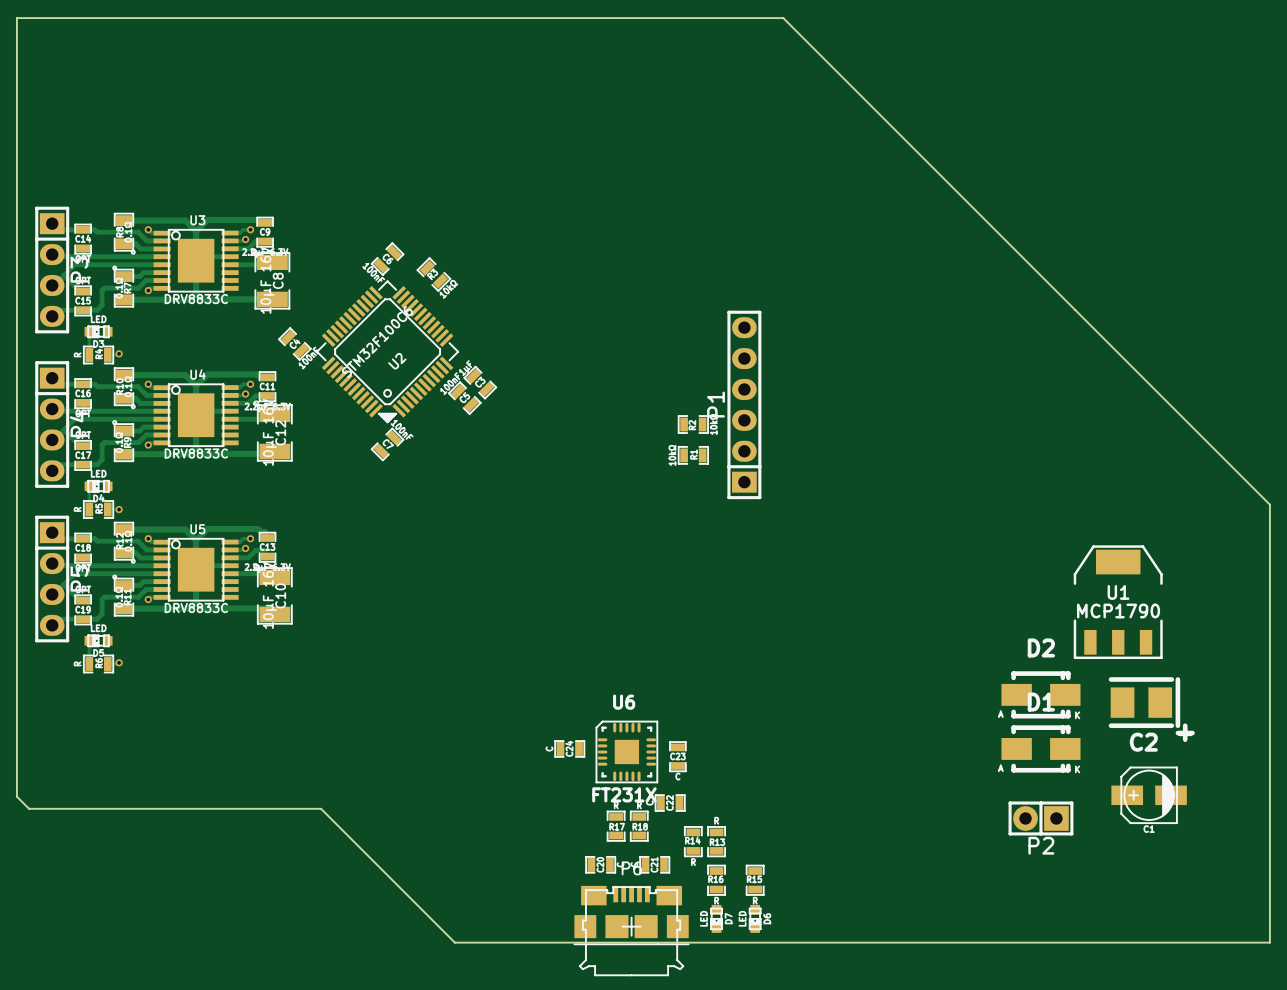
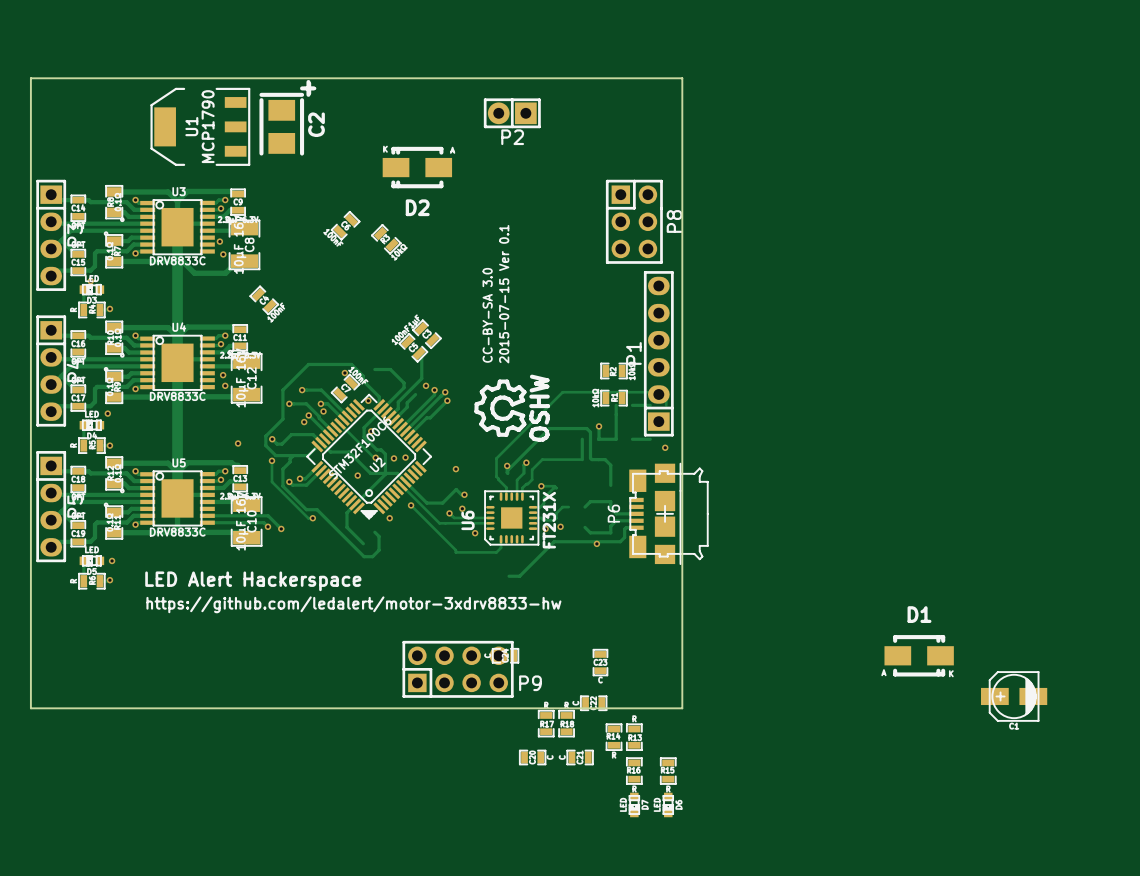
P8: none -> (634, 221)
track: none -> (177, 227) (177, 498)
via: none -> (219, 241)
via: none -> (223, 254)
track: (201, 299) (264, 299) -> (182, 261) (194, 273) (225, 273) (237, 261)
via: none -> (90, 281)
text: none -> 2015-07-15 Ver 0.1 (504, 294)
U2 position: (387, 351) -> (369, 456)
text: none -> CC-BY-SA 3.0 (487, 315)
track: none -> (421, 351) (421, 378) (398, 402) (398, 408) (390, 416)
track: none -> (374, 369) (390, 369) (404, 383) (404, 387) (364, 427) (364, 437) (376, 449) (381, 449) (385, 454) (385, 474) (347, 512) (347, 527) (363, 543)
via: none -> (344, 373)
drawing: none -> [474, 374, 551, 442]
via: none -> (223, 375)
via: none -> (225, 385)
via: none -> (426, 385)
track: none -> (302, 390) (321, 390) (347, 416)
via: none -> (302, 390)
track: none -> (434, 390) (434, 394) (401, 427)
via: none -> (434, 390)
track: none -> (445, 392) (405, 431)
via: none -> (445, 392)
track: none -> (415, 394) (407, 402) (407, 407) (394, 420)
via: none -> (368, 400)
track: none -> (447, 400) (409, 435)
via: none -> (447, 400)
track: none -> (289, 403) (306, 403) (332, 431)
via: none -> (289, 403)
track: none -> (320, 403) (327, 403) (343, 420)
via: none -> (320, 403)
track: none -> (379, 404) (379, 396) (363, 381) (363, 376) (351, 364) (308, 364) (282, 390) (282, 419) (265, 436) (265, 445) (275, 455) (308, 455) (317, 446)
track: none -> (616, 405) (616, 439) (598, 439) (599, 426)
track: none -> (632, 405) (650, 405)
track: none -> (666, 405) (666, 398) (660, 392) (562, 392) (496, 458) (496, 476) (506, 487) (506, 496)
via: none -> (323, 411)
via: none -> (107, 413)
track: none -> (308, 415) (328, 435)
via: none -> (308, 415)
via: none -> (304, 422)
track: none -> (340, 423) (375, 457)
via: none -> (599, 426)
via: none -> (371, 431)
track: none -> (272, 439) (277, 444) (281, 444) (291, 434) (313, 434) (330, 452) (349, 452) (370, 473) (397, 473) (426, 503) (442, 503) (456, 489) (461, 494) (464, 494)
via: none -> (272, 439)
track: none -> (582, 439) (582, 459) (542, 459) (532, 469) (532, 479) (522, 488) (522, 496)
track: none -> (632, 439) (650, 439)
via: none -> (238, 443)
via: none -> (665, 447)
track: none -> (293, 455) (282, 469) (282, 486) (306, 509) (317, 509) (364, 556) (372, 556) (379, 550) (379, 536) (374, 532)
via: none -> (375, 457)
via: none -> (405, 457)
via: none -> (393, 458)
track: none -> (271, 460) (271, 481) (308, 518) (312, 518)
via: none -> (271, 460)
track: none -> (526, 462) (523, 465) (523, 473) (517, 480) (517, 496)
via: none -> (526, 462)
track: none -> (507, 465) (507, 473) (507, 470) (549, 428) (586, 428) (590, 432) (590, 458) (605, 459) (610, 465) (610, 485)
via: none -> (507, 465)
track: none -> (317, 466) (305, 478) (300, 478)
via: none -> (455, 469)
track: none -> (321, 470) (306, 485) (292, 485) (289, 481)
via: none -> (357, 475)
via: none -> (300, 478)
via: none -> (289, 481)
track: none -> (401, 485) (439, 523) (490, 523)
track: none -> (541, 486) (554, 486) (556, 488) (553, 488) (544, 497) (544, 503) (540, 507) (533, 507)
via: none -> (541, 486)
via: none -> (464, 494)
track: none -> (411, 505) (455, 550) (455, 552) (496, 552) (501, 547) (501, 539)
via: none -> (411, 505)
track: none -> (568, 507) (562, 507) (556, 513) (554, 520) (533, 517)
track: none -> (585, 507) (590, 501) (610, 501) (610, 508) (616, 513) (636, 513)
via: none -> (462, 508)
track: none -> (449, 513) (454, 517) (490, 517)
via: none -> (449, 513)
track: none -> (207, 515) (268, 515) (281, 528)
via: none -> (312, 518)
via: none -> (389, 518)
track: none -> (636, 520) (616, 520) (610, 526) (610, 532) (590, 532) (585, 527)
track: none -> (207, 522) (263, 522) (267, 526)
via: none -> (267, 526)
via: none -> (560, 526)
U1 rotation: 0° (1118, 602) -> 90° counterclockwise (200, 126)
U1 position: (1118, 602) -> (200, 126)
track: none -> (636, 527) (626, 527) (624, 537) (620, 541) (554, 541) (519, 576) (509, 576)
via: none -> (281, 528)
via: none -> (545, 528)
via: none -> (475, 533)
via: none -> (596, 543)
via: none -> (112, 560)
text: none -> LED Alert Hackerspace (253, 581)
text: none -> https://github.com/ledalert/motor-3xdrv8833-hw (353, 604)
D2 rotation: 0° (1040, 694) -> 180° (417, 167)
D2 position: (1040, 694) -> (417, 167)
C2 rotation: 0° (1151, 709) -> 90° counterclockwise (287, 117)
C2 position: (1151, 709) -> (287, 117)
U6 rotation: 0° (626, 752) -> 90° counterclockwise (511, 517)
U6 position: (626, 752) -> (511, 517)
P9: none -> (458, 669)
board edge: (29, 808) (16, 796) (16, 18) (783, 18) (1269, 504) (1269, 942) (454, 942) (321, 808) -> (30, 708) (30, 78) (682, 78) (682, 708) (287, 708)
P2 position: (1040, 818) -> (512, 113)
P6 rotation: 0° (631, 931) -> 90° counterclockwise (668, 513)
P6 position: (631, 931) -> (668, 513)

